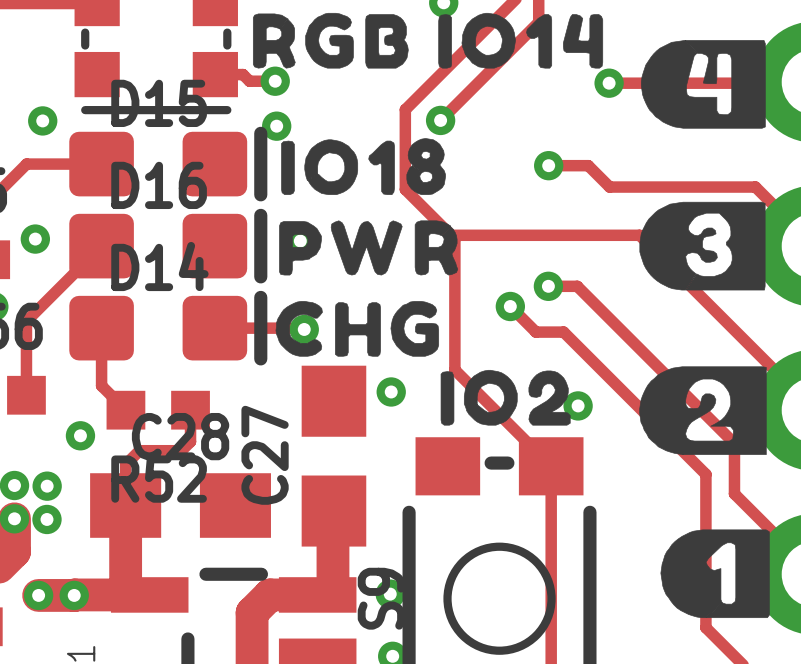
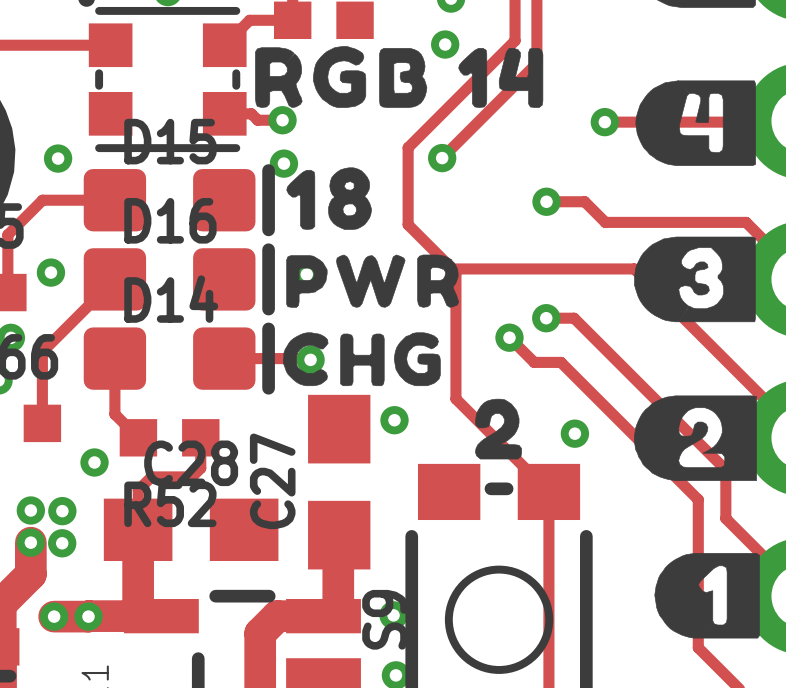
drawing shape: [252, 12, 604, 69] -> [255, 46, 544, 108]
drawing shape: [281, 138, 446, 195] -> [286, 167, 372, 230]
drawing shape: [440, 369, 571, 426] -> [475, 398, 522, 460]

